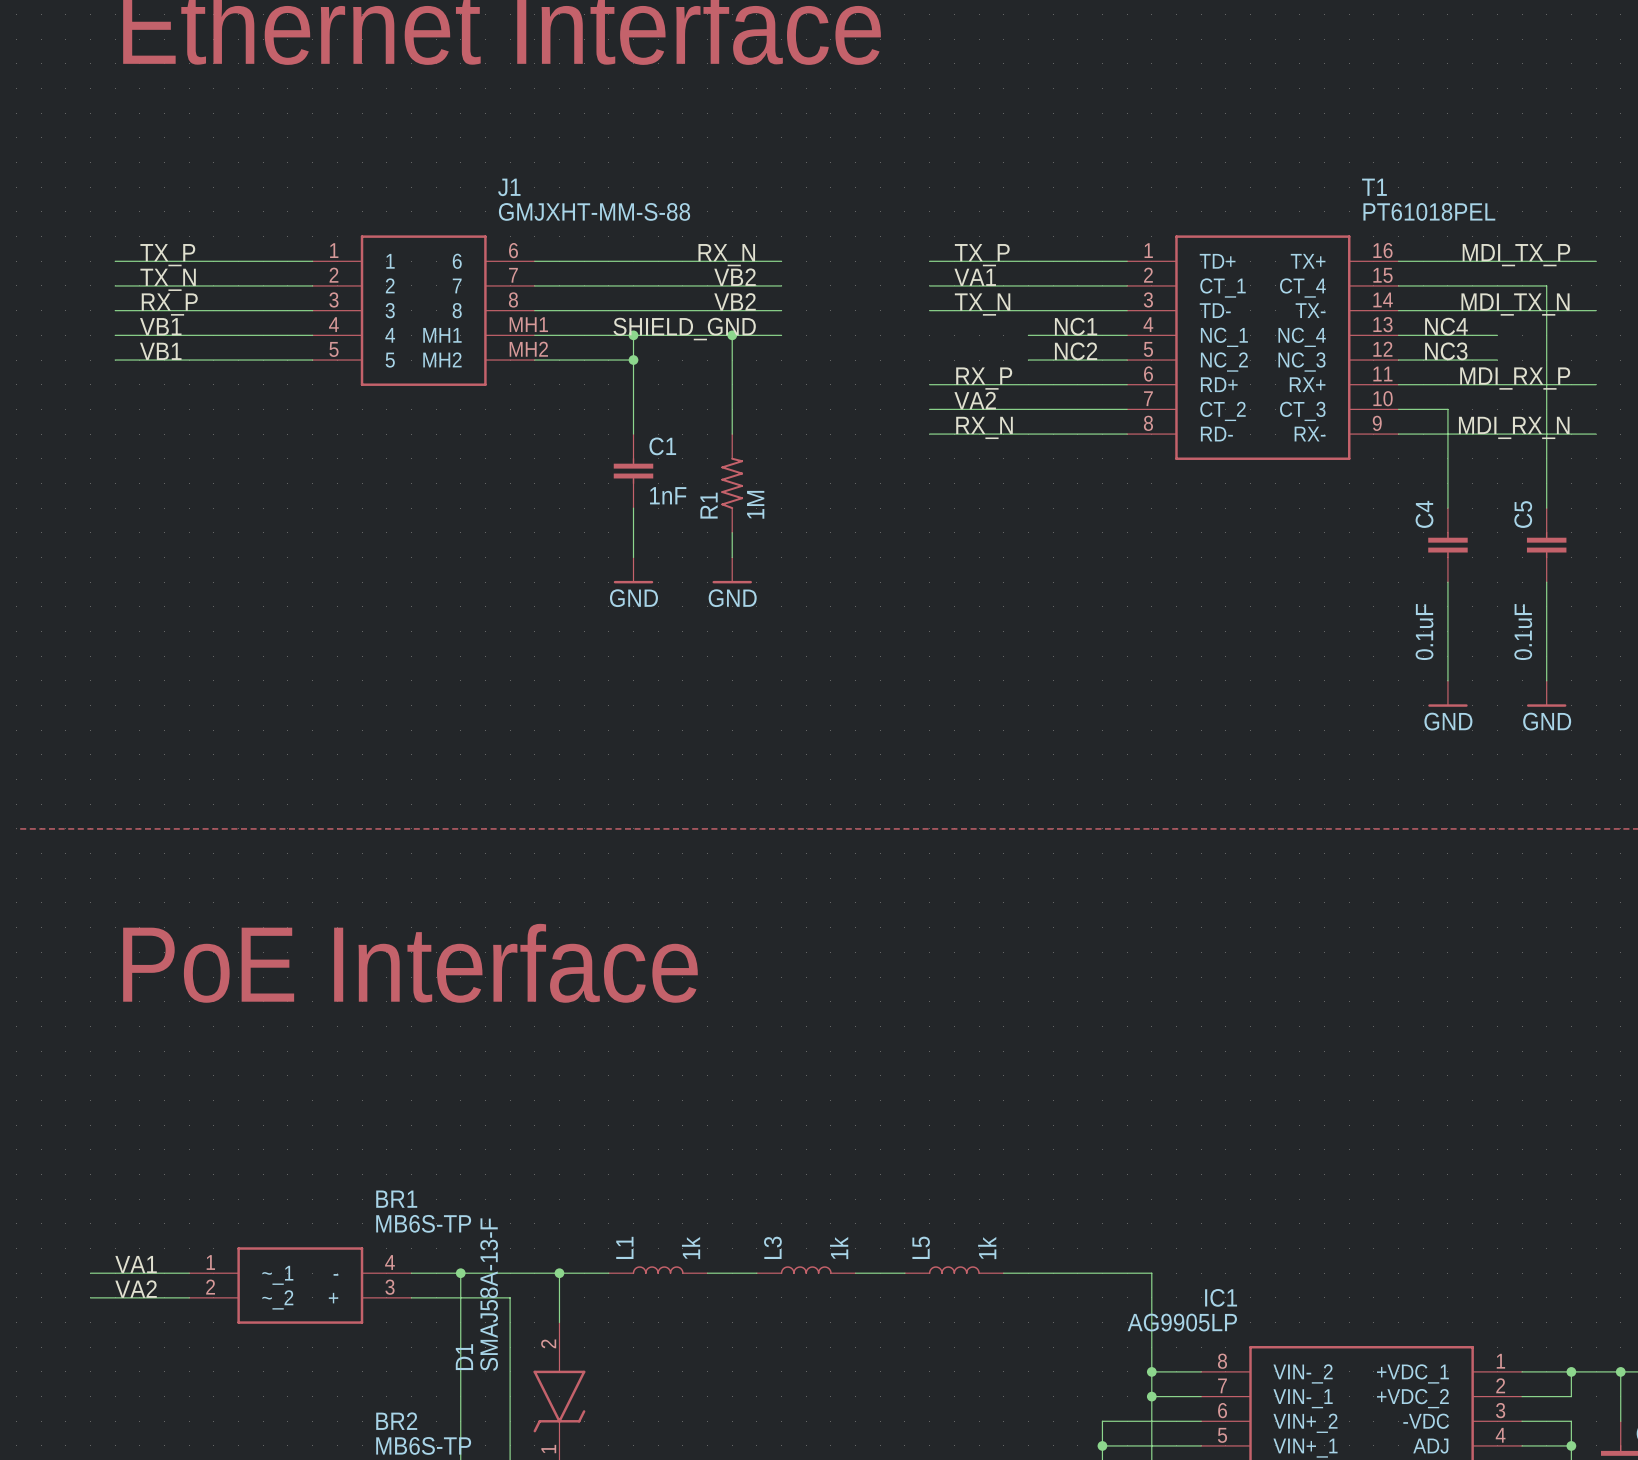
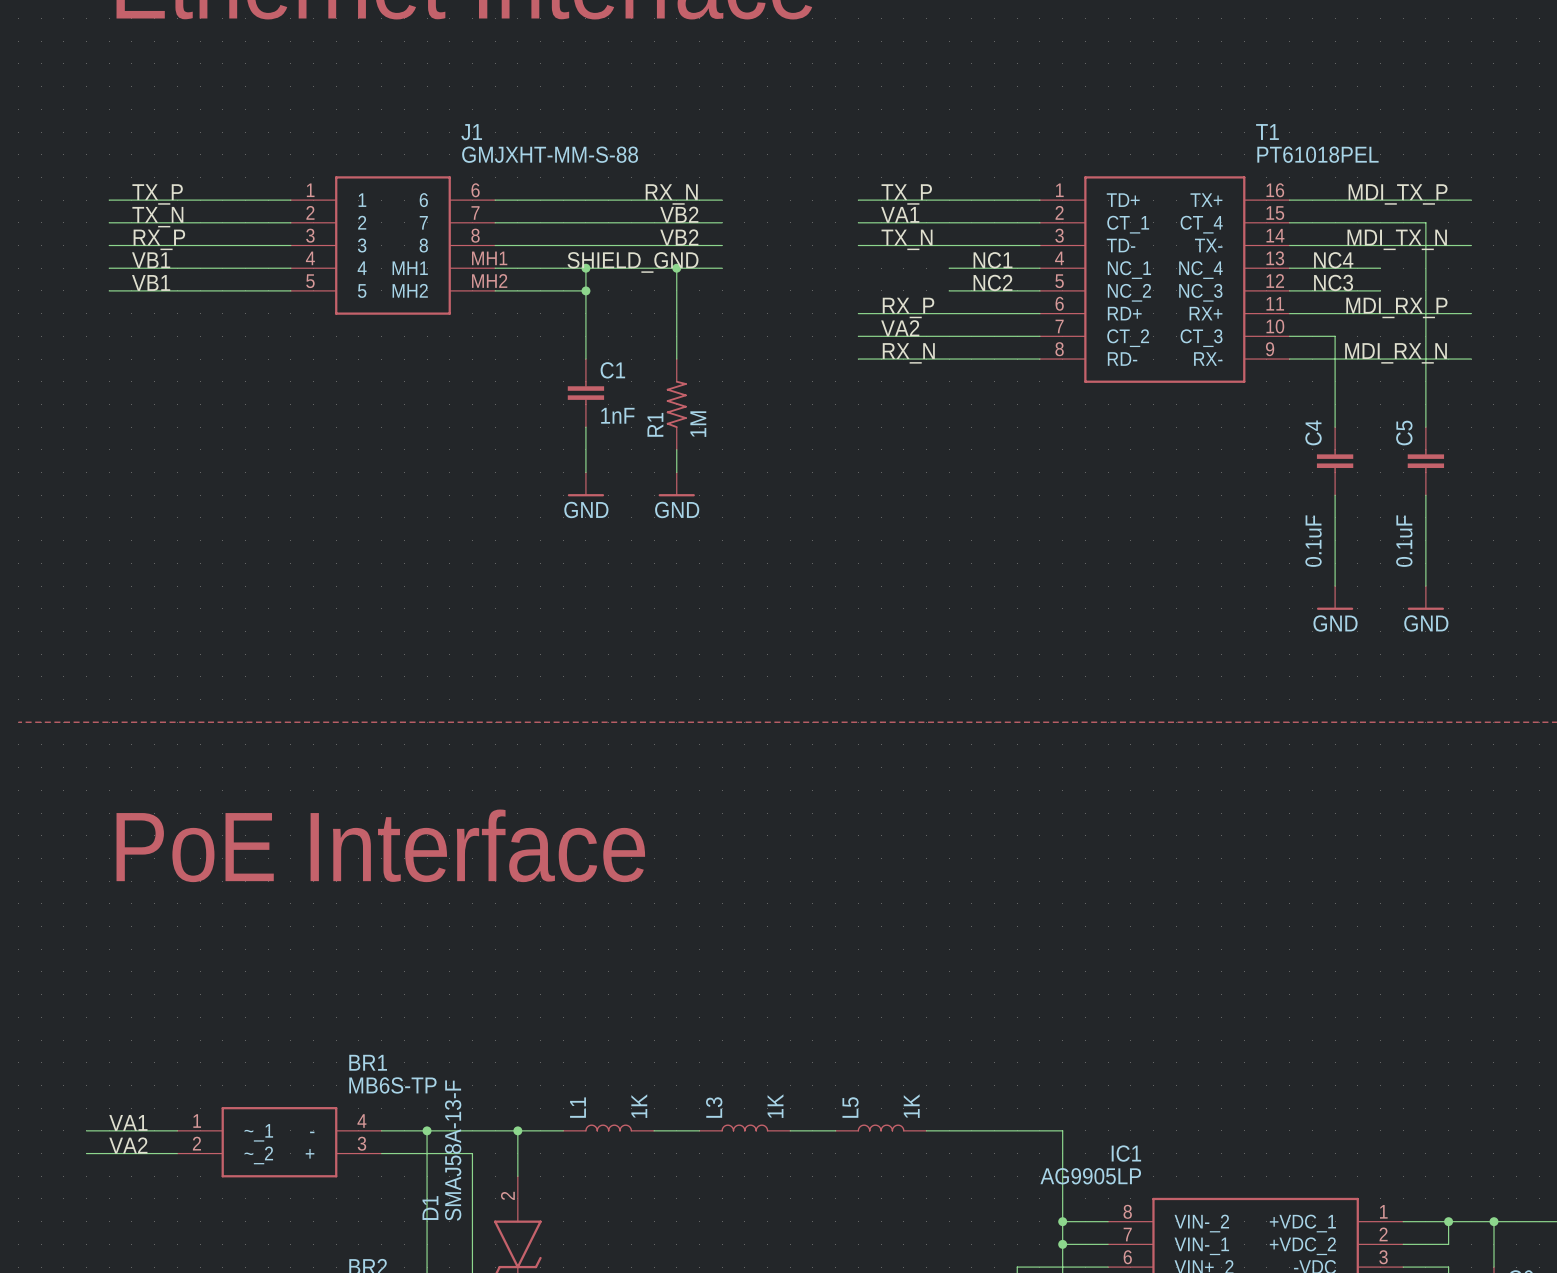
L1 value: 1k (691, 1248) -> 1K (639, 1106)
L3 value: 1k (839, 1248) -> 1K (775, 1106)
L5 value: 1k (987, 1248) -> 1K (911, 1106)

